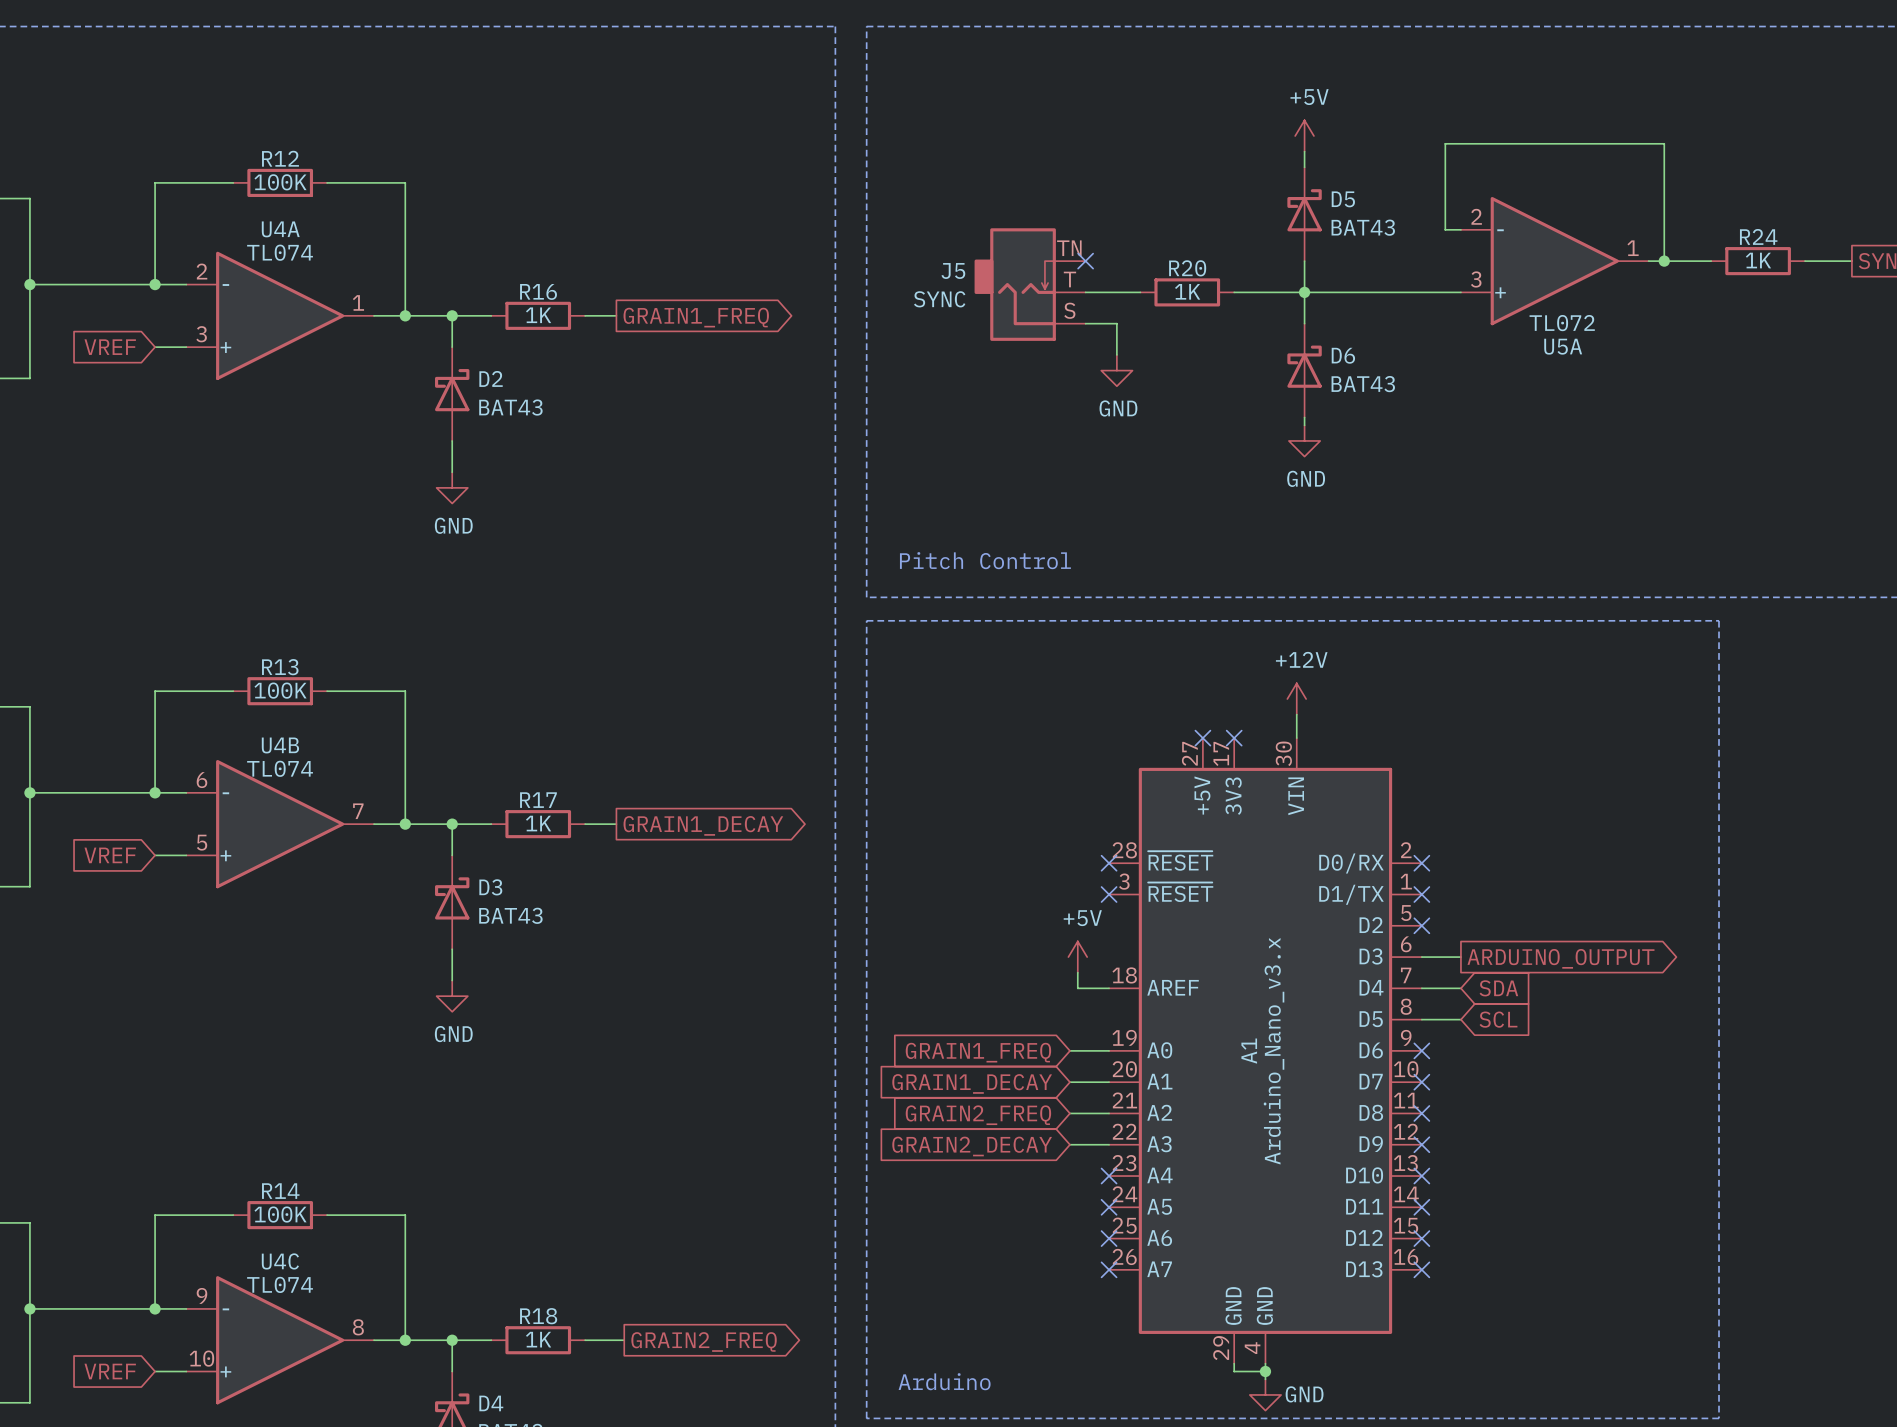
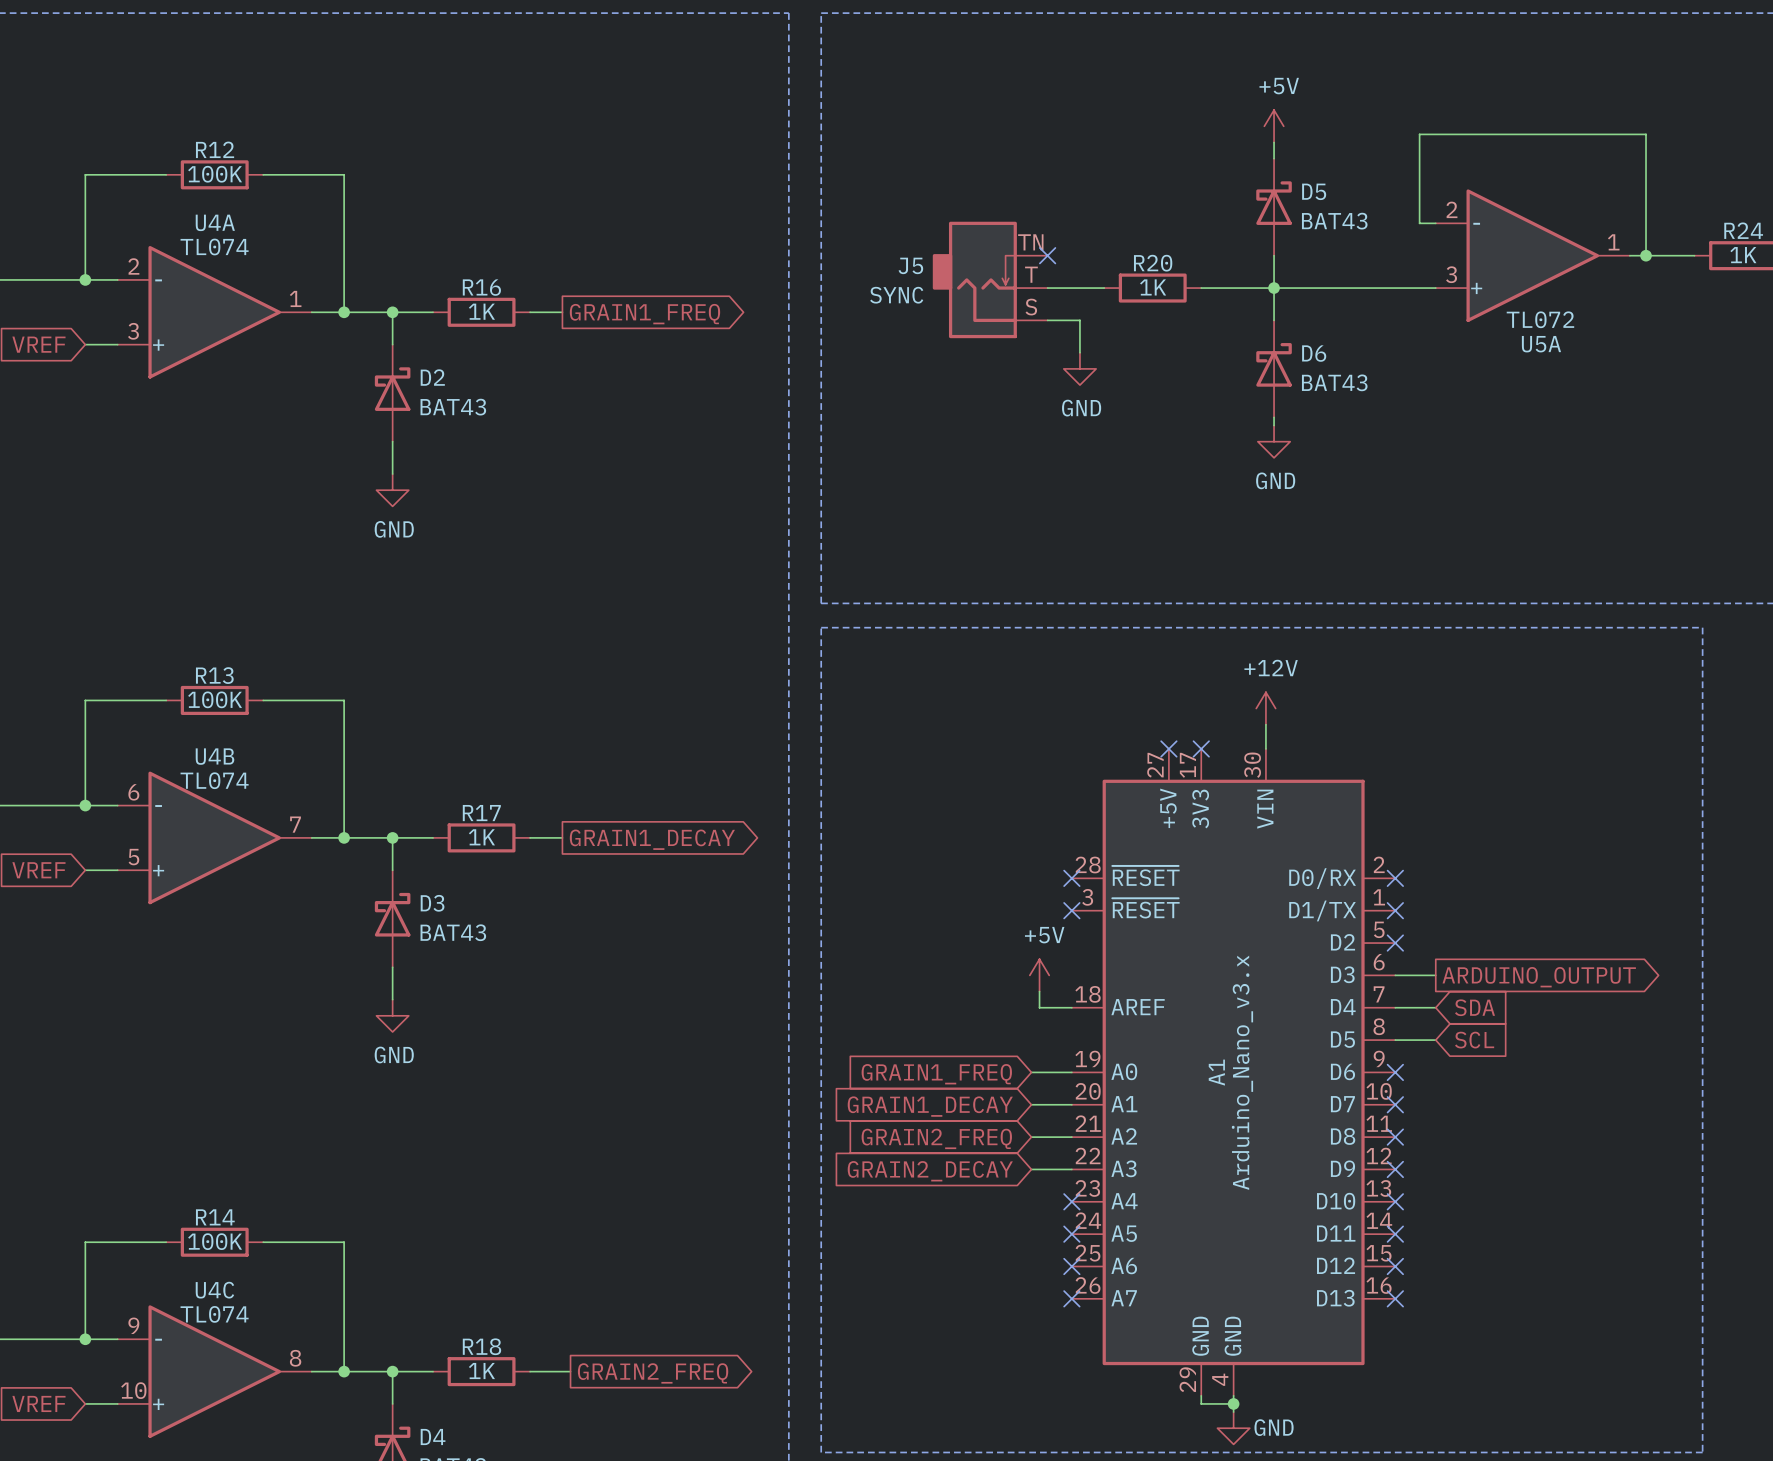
text: Pitch Control (985, 560) -> none
text: Arduino (944, 1381) -> none

